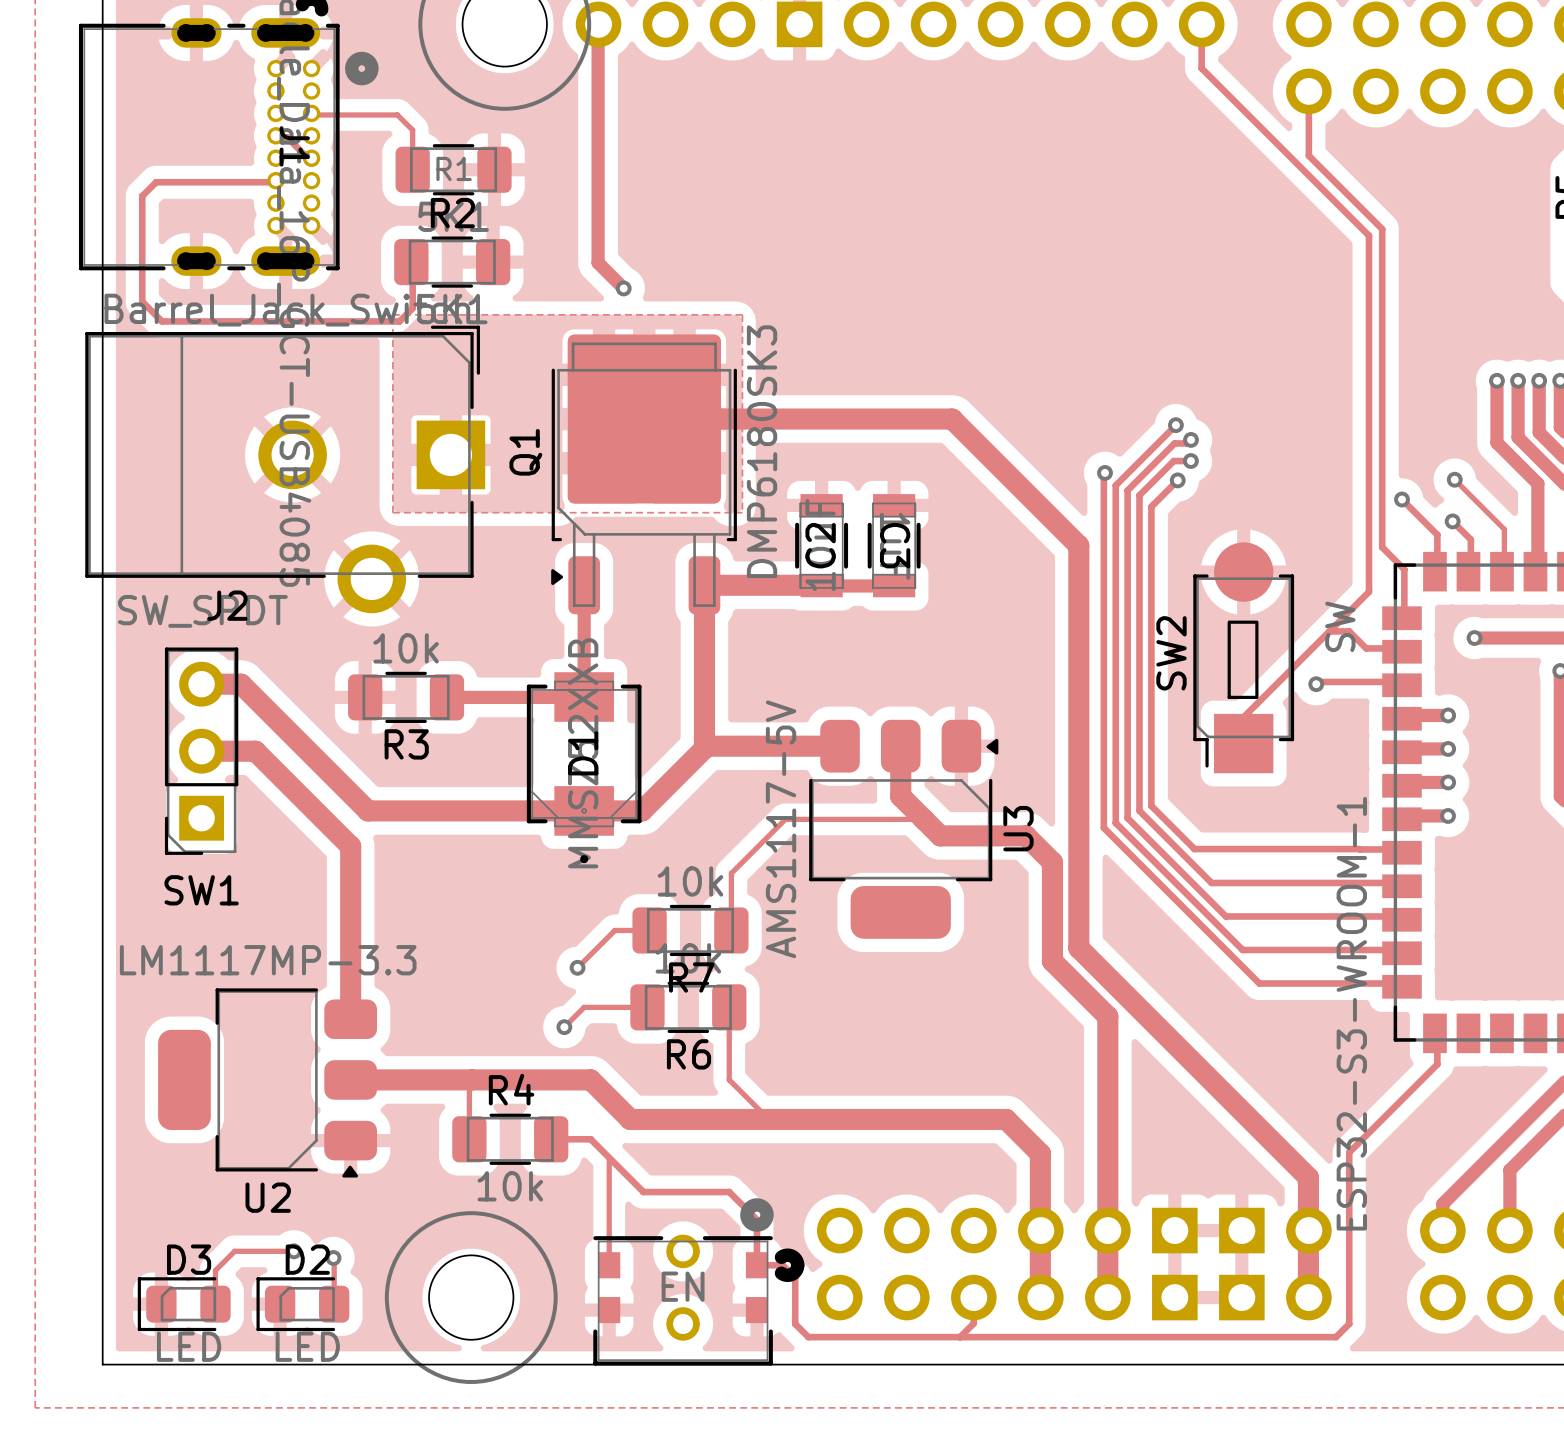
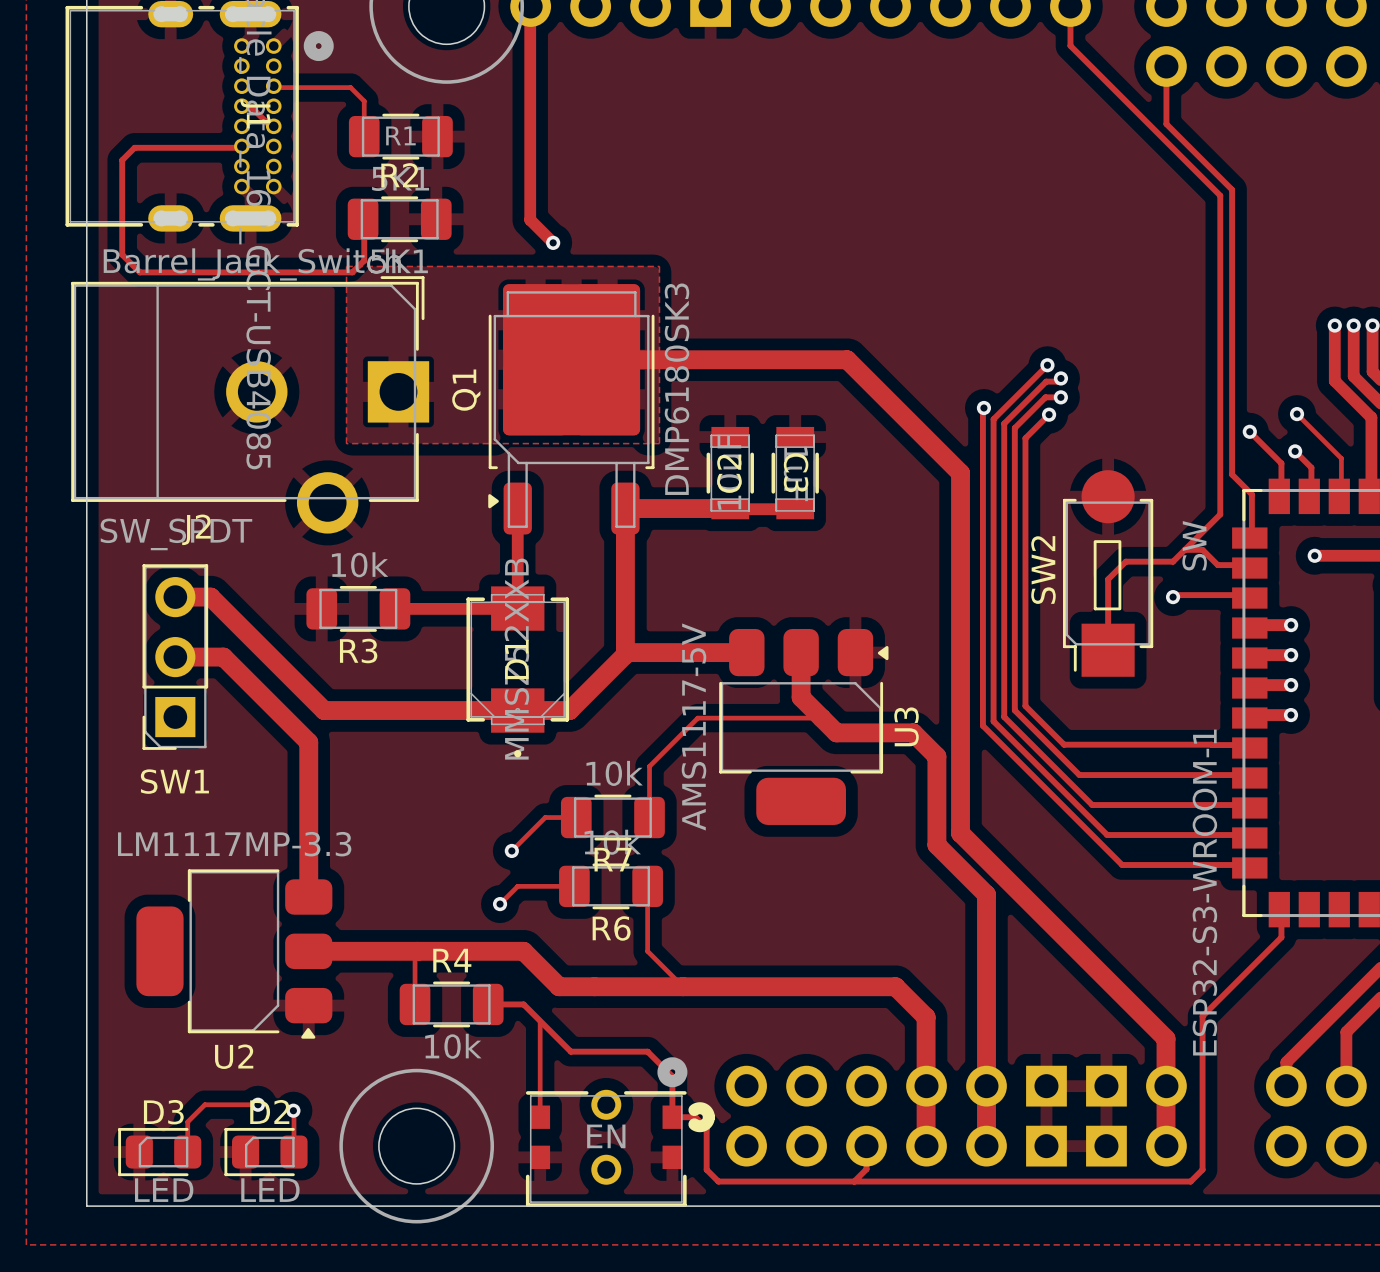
track: (1316, 644) (1243, 717) -> (1173, 561) (1125, 561) (1108, 579) (1108, 626)

